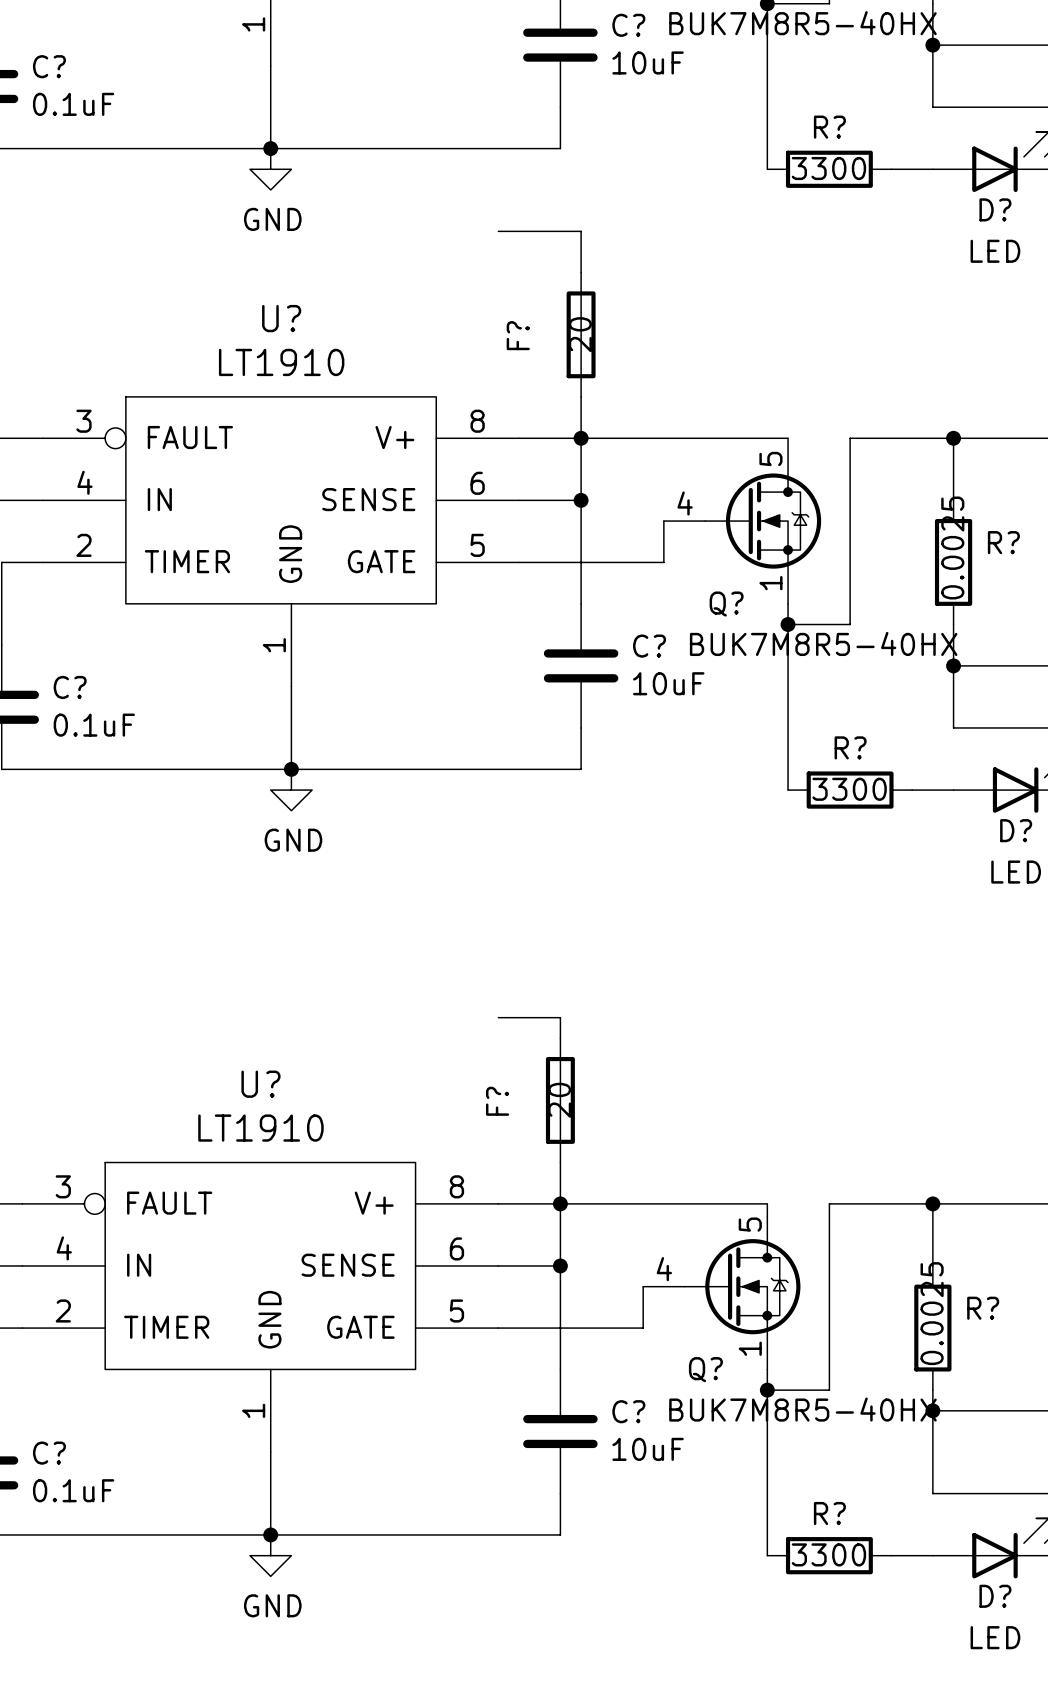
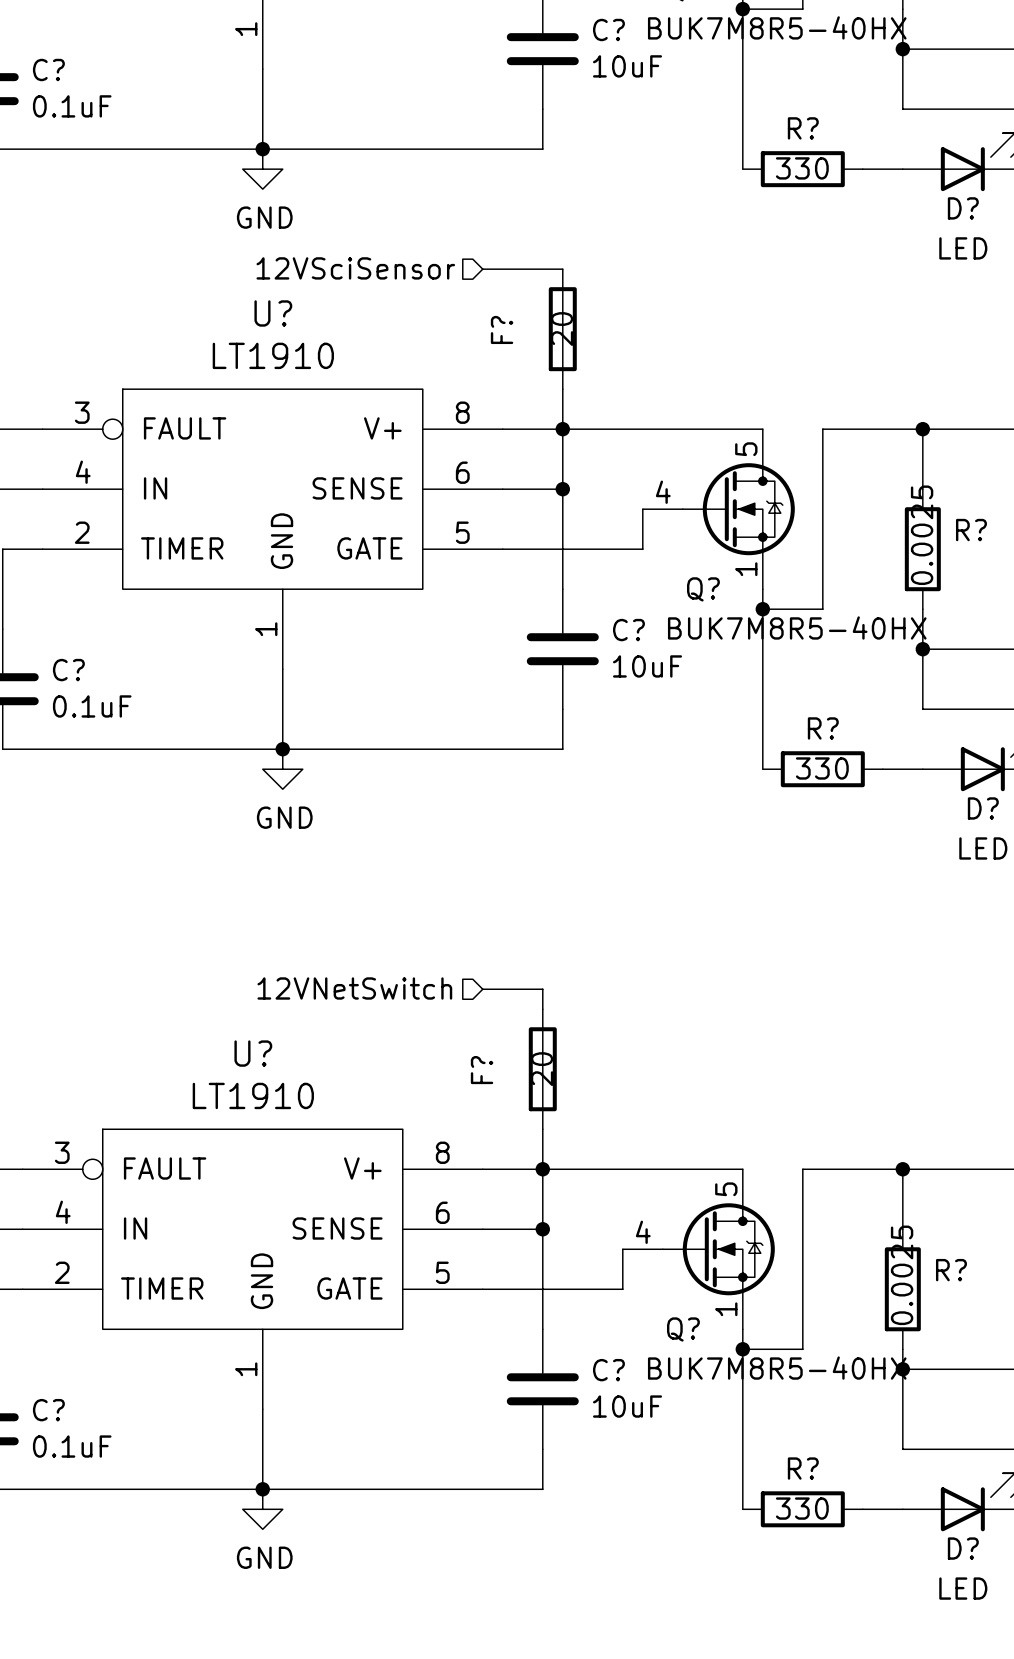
R? value: 3300 (828, 168) -> 330 (802, 168)
wire: (498, 231) (581, 231) (581, 272) -> (482, 269) (562, 269)
hierarchical label: none -> 12VSciSensor (355, 268)
R? value: 3300 (849, 789) -> 330 (822, 768)
hierarchical label: none -> 12VNetSwitch (354, 988)
R? value: 3300 (828, 1554) -> 330 (802, 1508)

